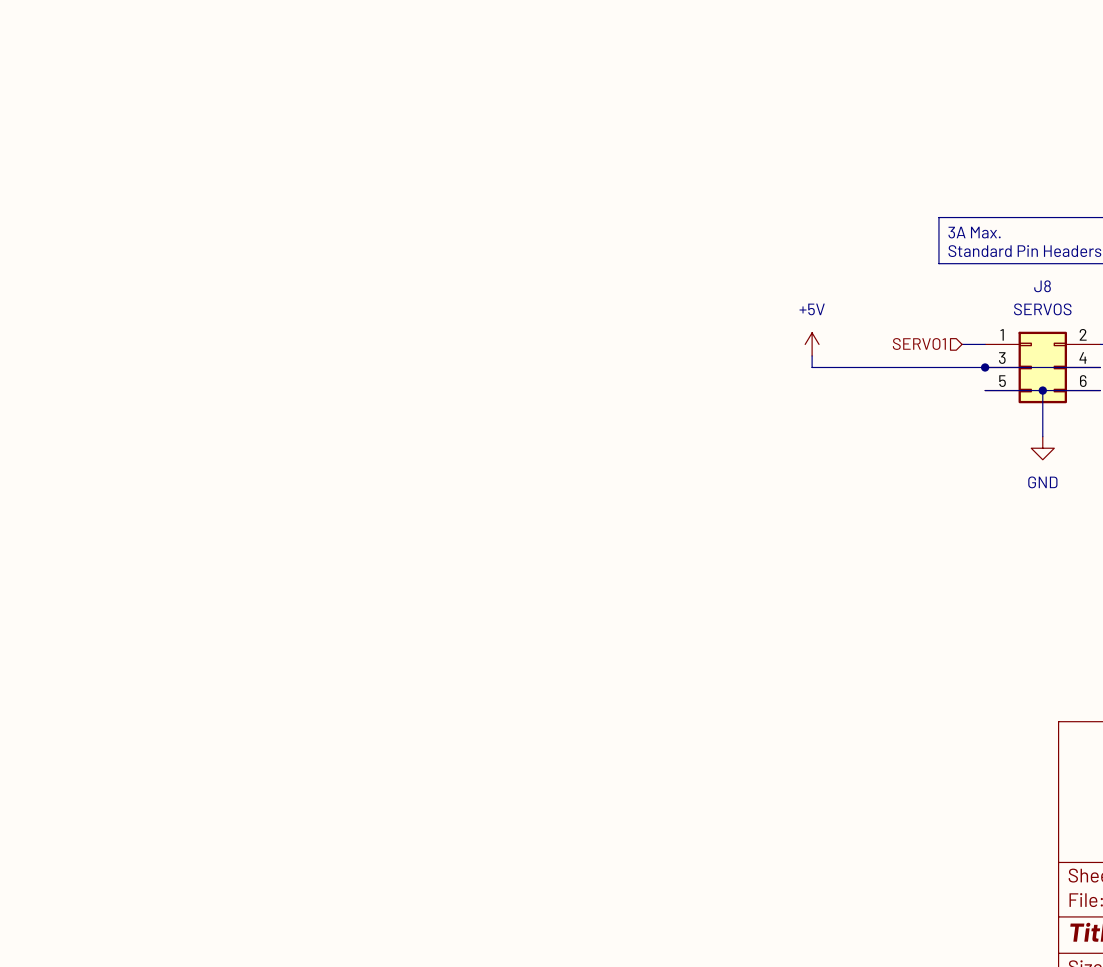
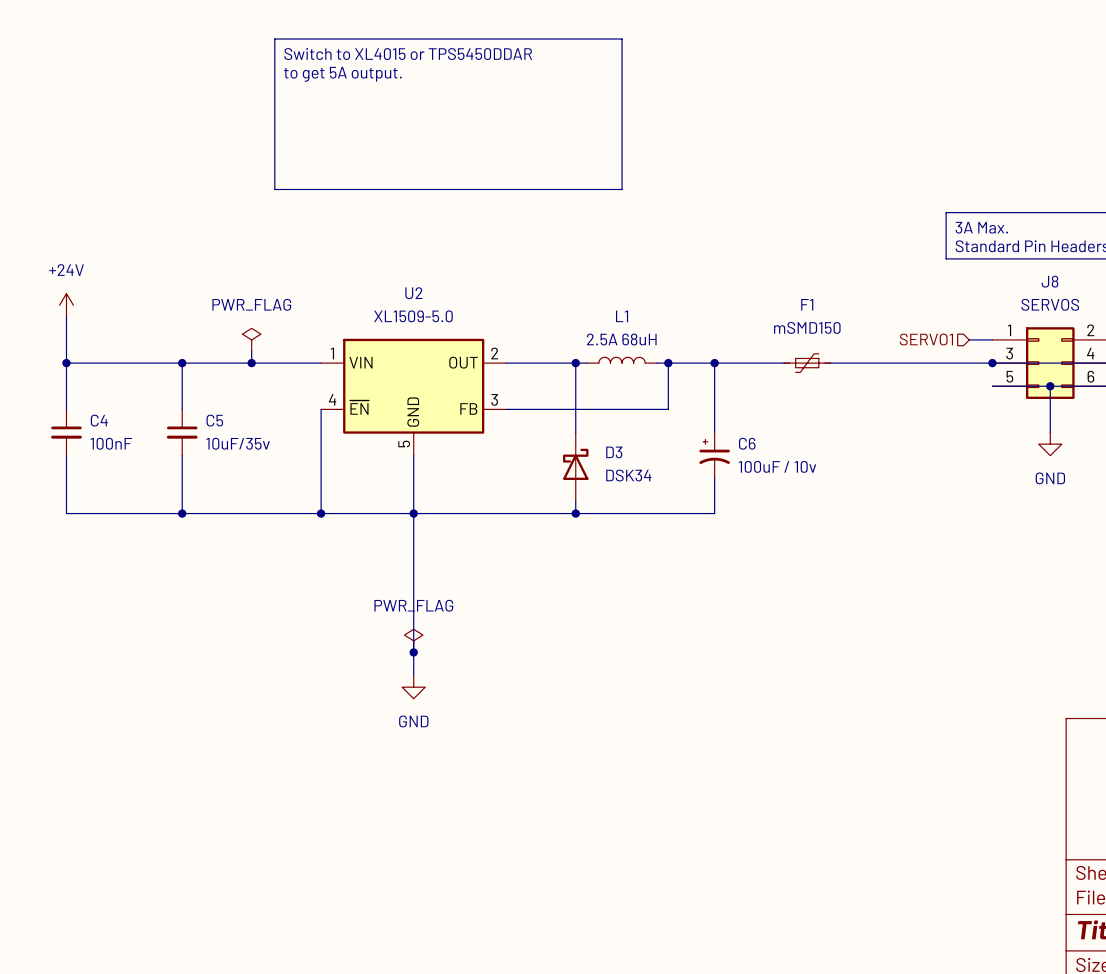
line: none -> (274, 39) (622, 39) (622, 189) (274, 189) (274, 39)
text: none -> Switch to XL4015 or TPS5450DDAR (408, 54)
text: none -> to get 5A output. (342, 74)
power symbol: none -> +24V (66, 305)
wire: none -> (66, 316) (66, 409)
power symbol: none -> PWR_FLAG (251, 339)
power symbol: +5V (812, 344) -> none
wire: none -> (251, 351) (251, 363)
L1: none -> 2.5A 68uH (622, 360)
wire: none -> (66, 363) (321, 363)
junction: none -> (66, 363)
wire: none -> (182, 363) (182, 409)
junction: none -> (182, 363)
junction: none -> (251, 363)
wire: none -> (506, 363) (587, 363)
wire: none -> (575, 363) (575, 432)
junction: none -> (575, 363)
wire: none -> (656, 363) (784, 363)
wire: none -> (668, 363) (668, 409) (506, 409)
junction: none -> (668, 363)
wire: none -> (714, 363) (714, 432)
junction: none -> (714, 363)
F1: none -> mSMD150 (807, 363)
U2: none -> XL1509-5.0 (413, 397)
wire: none -> (321, 409) (321, 513)
C4: none -> 100nF (66, 432)
C5: none -> 10uF/35v (182, 432)
wire: none -> (66, 455) (66, 513) (714, 513) (714, 478)
wire: none -> (182, 455) (182, 513)
wire: none -> (413, 455) (413, 675)
C6: none -> 100uF / 10v (714, 455)
D3: none -> DSK34 (575, 467)
wire: none -> (575, 501) (575, 513)
junction: none -> (182, 513)
junction: none -> (321, 513)
junction: none -> (413, 513)
junction: none -> (575, 513)
power symbol: none -> PWR_FLAG (413, 640)
junction: none -> (413, 652)
power symbol: none -> GND (413, 687)

